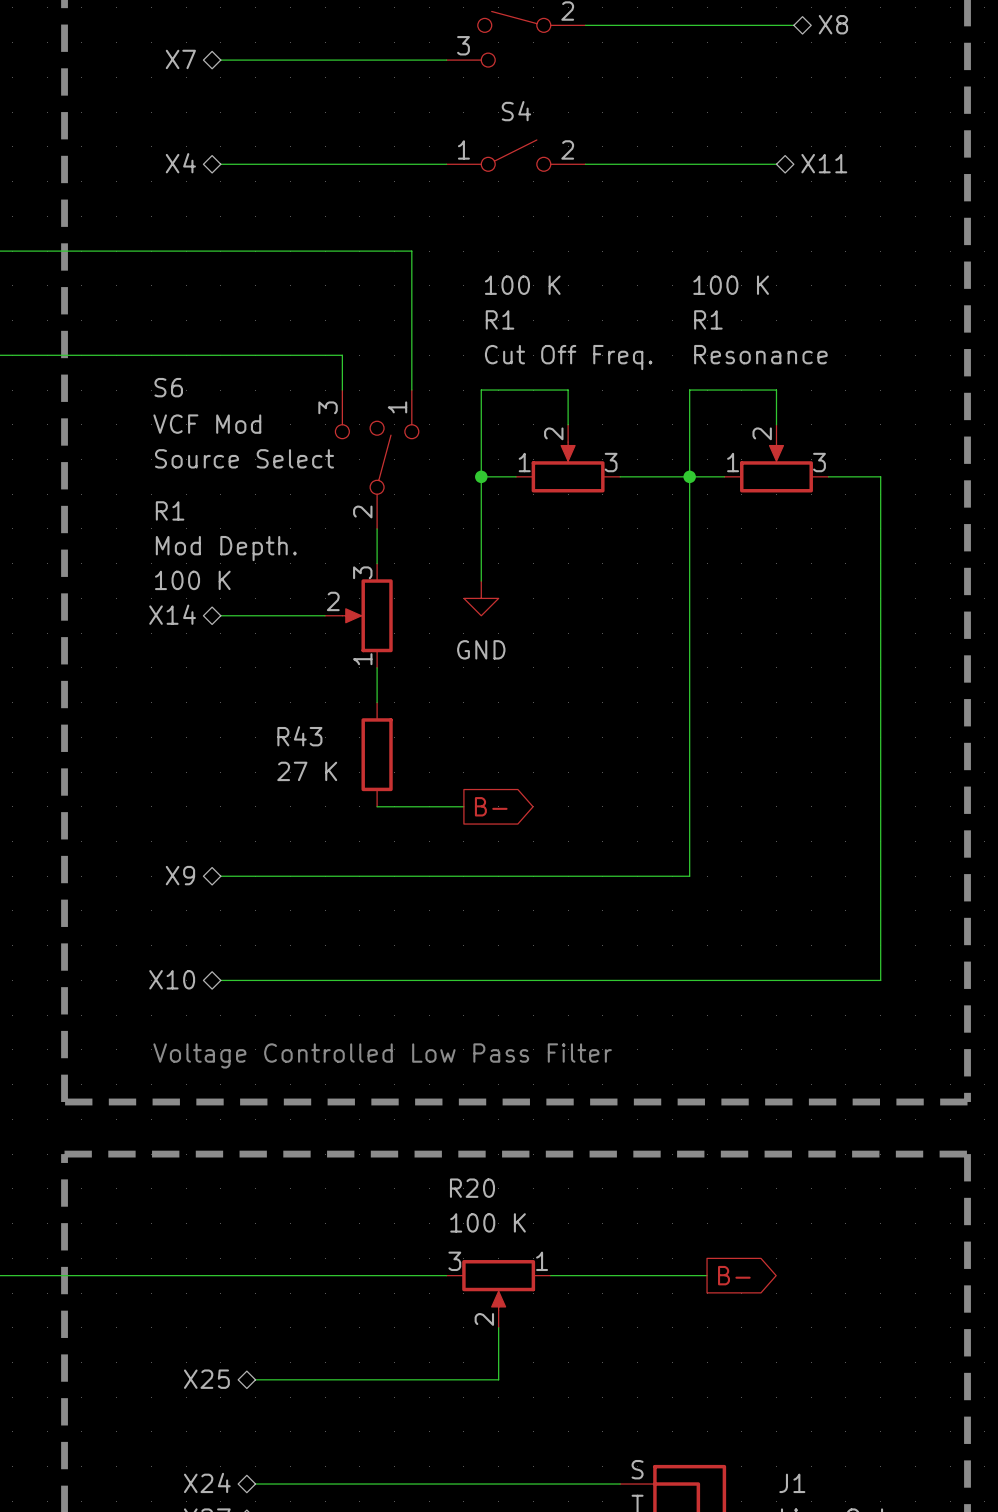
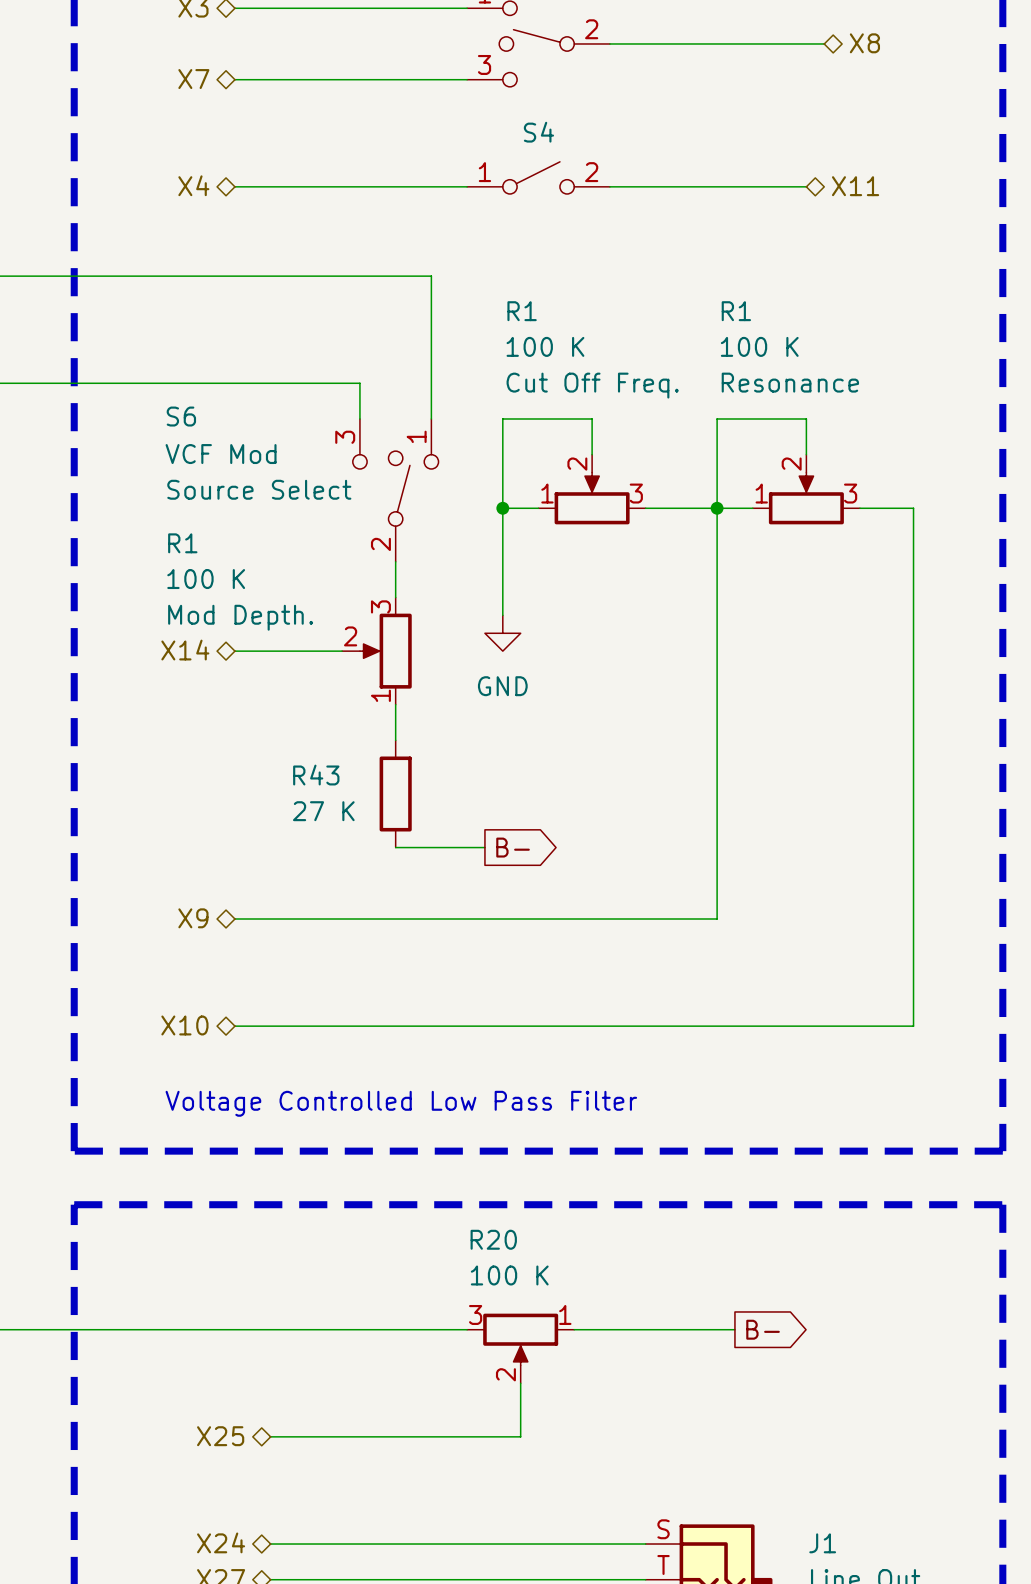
R1 value position: 100 K (522, 285) -> 100 K (545, 346)
R1 value position: 100 K (731, 285) -> 100 K (759, 346)
R1 name position: R1 (500, 319) -> R1 (522, 311)
R1 name position: R1 (708, 319) -> R1 (736, 311)
R1 text position: Mod Depth. (226, 548) -> Mod Depth. (240, 617)
R1 value position: 100 K (192, 580) -> 100 K (206, 579)

